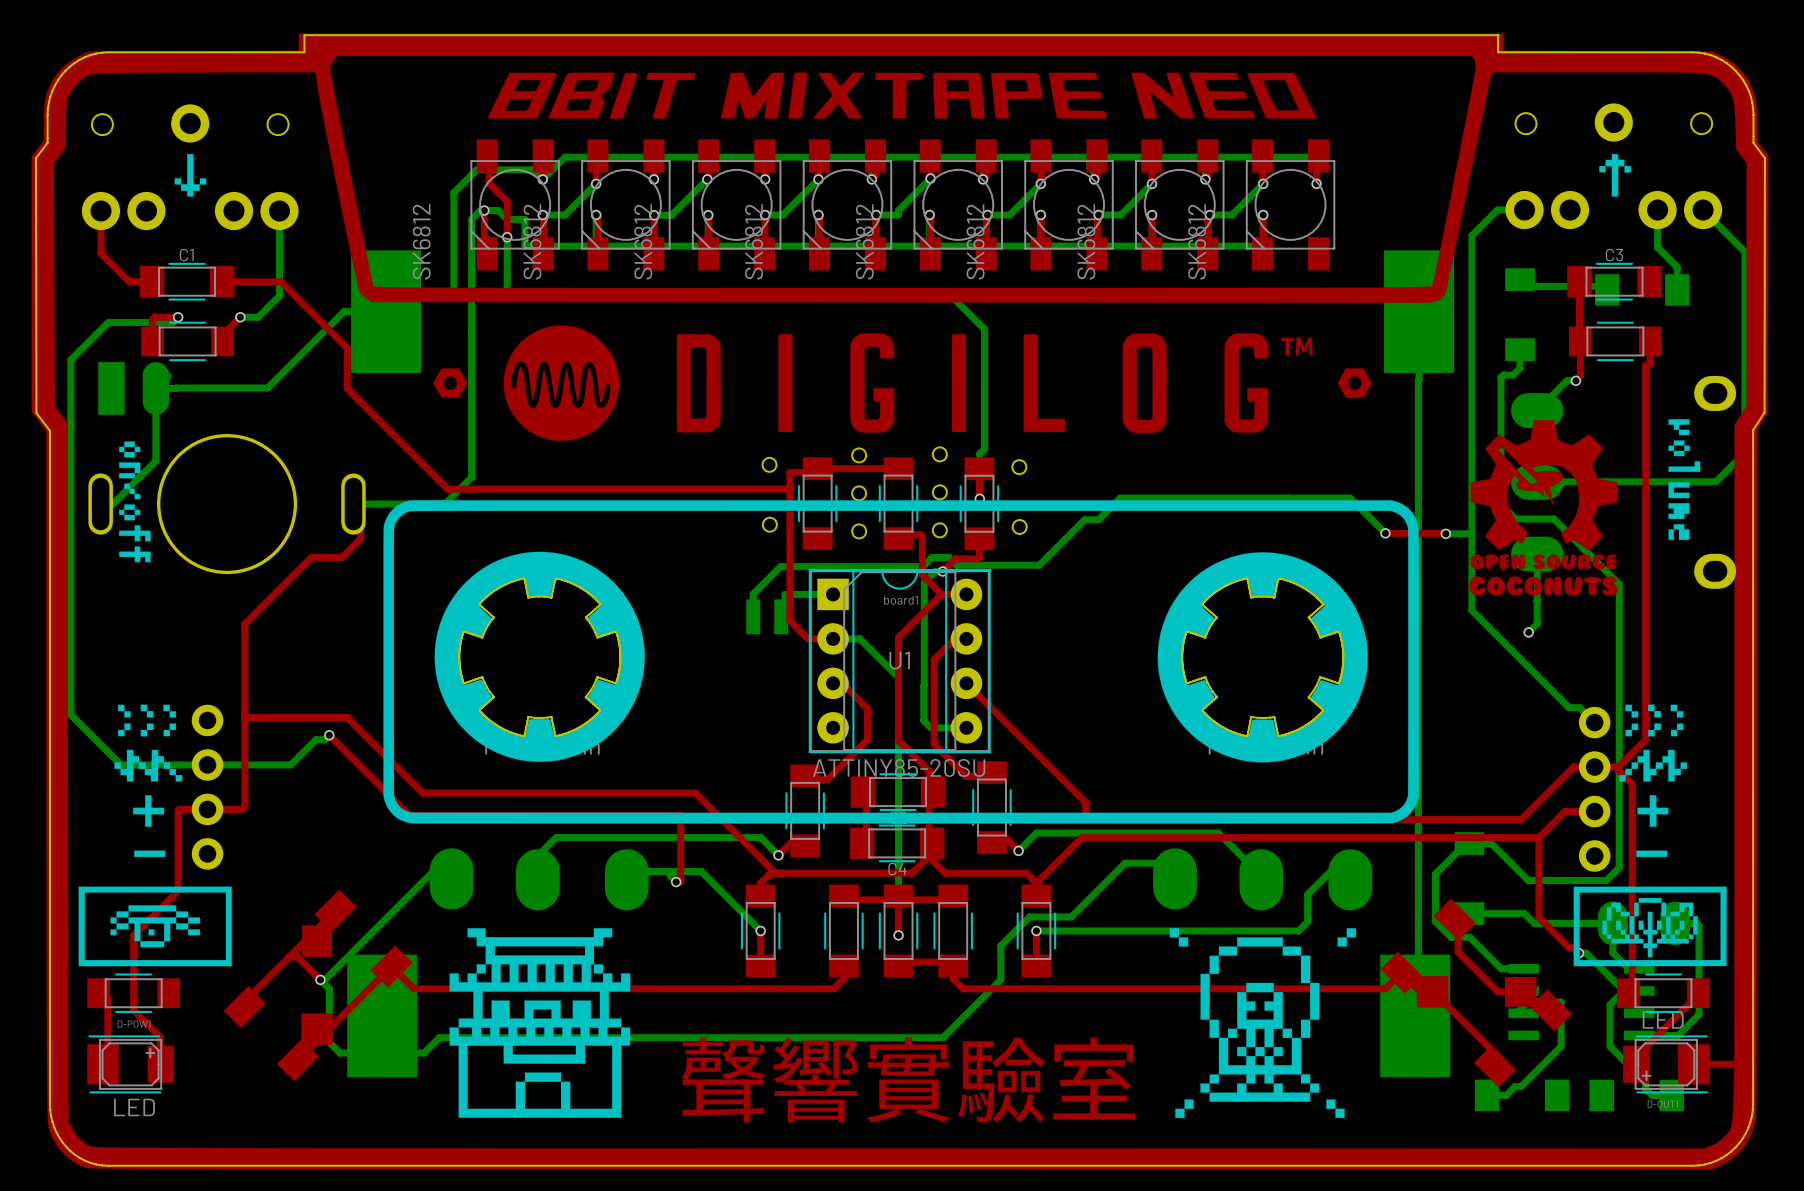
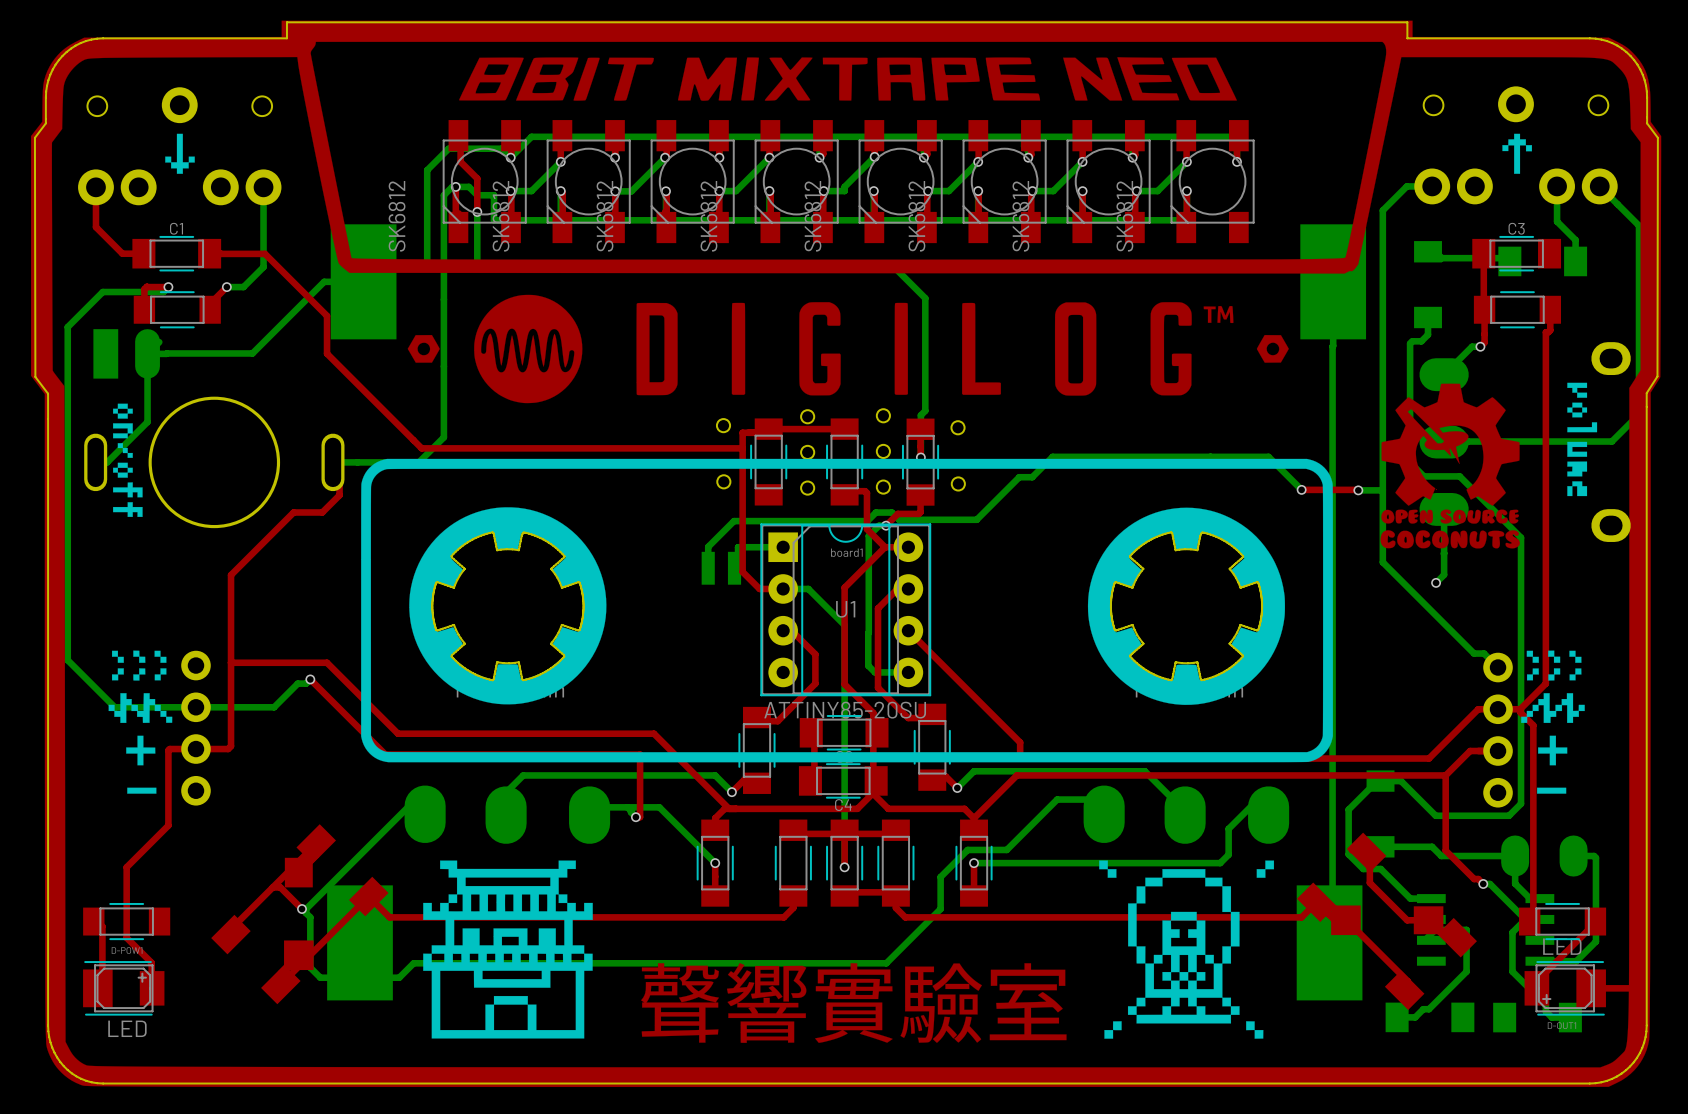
board1 footprint: [31, 33, 1769, 1170] -> [31, 20, 1662, 1088]

